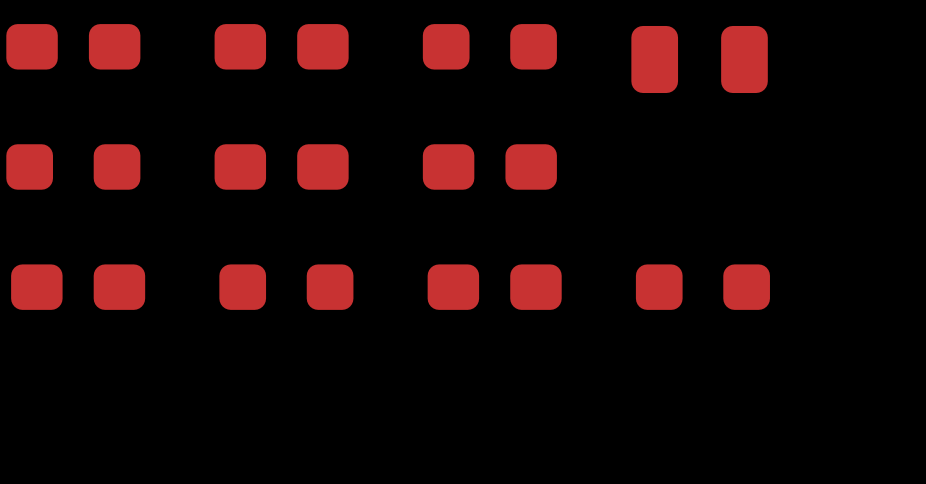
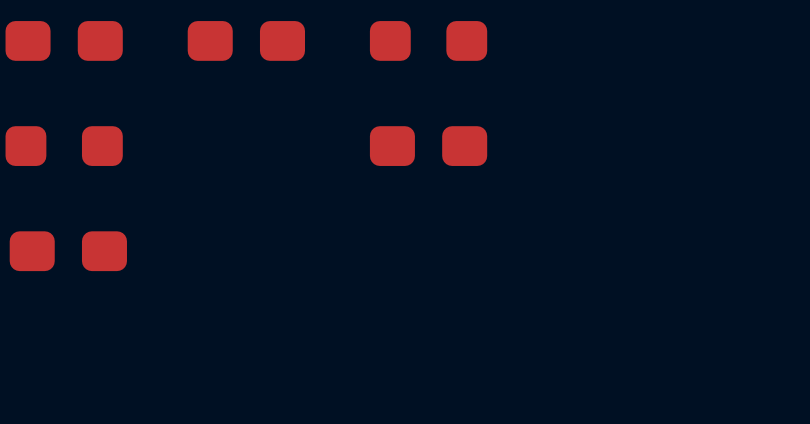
part: (699, 59) -> none
part: (281, 166) -> none
part: (286, 287) -> none
part: (494, 287) -> none
part: (702, 287) -> none

